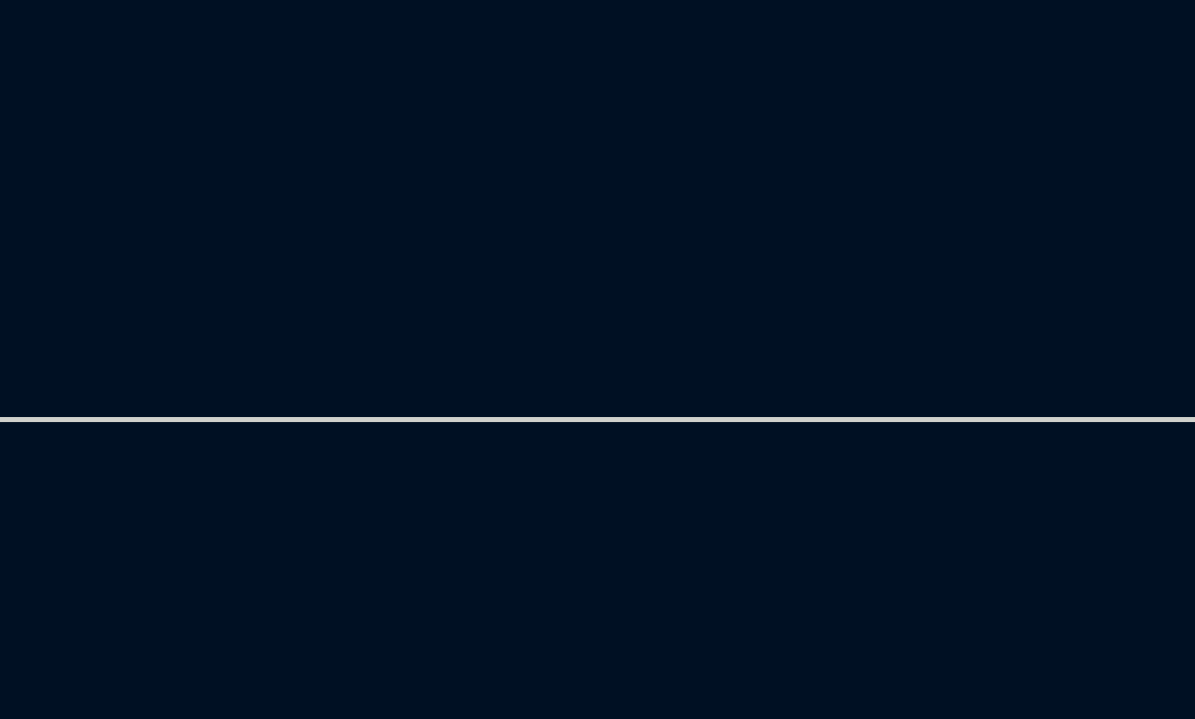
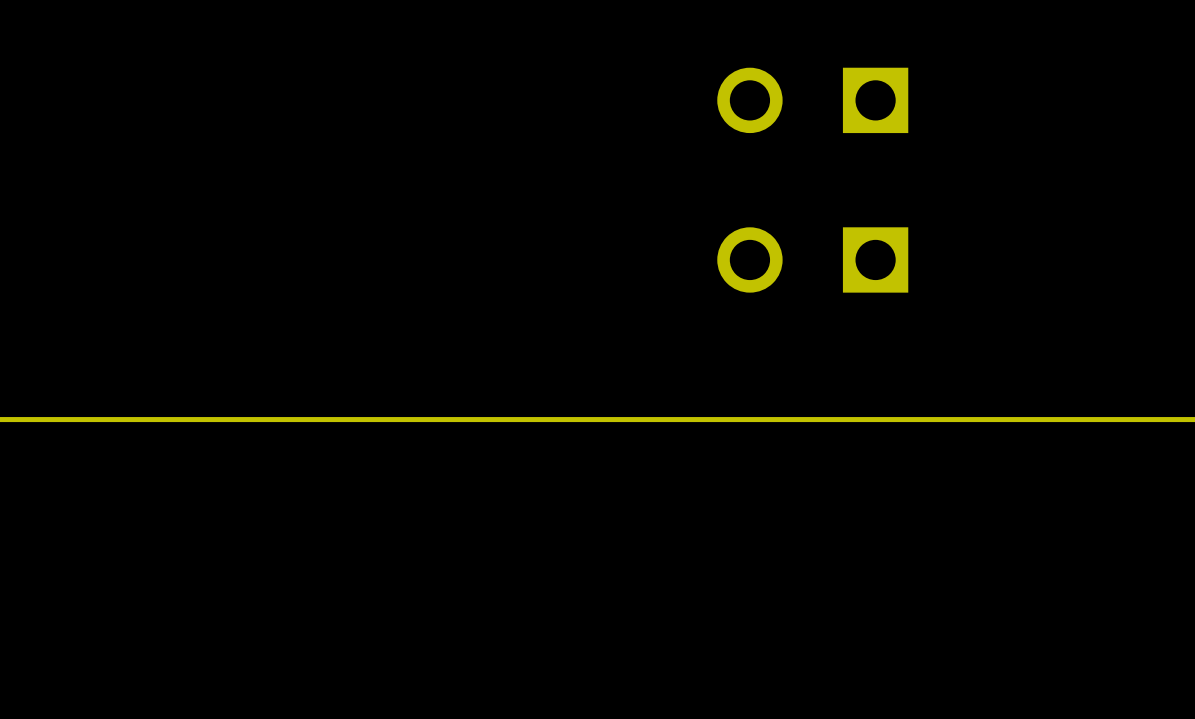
part: none -> (812, 100)
part: none -> (812, 259)

